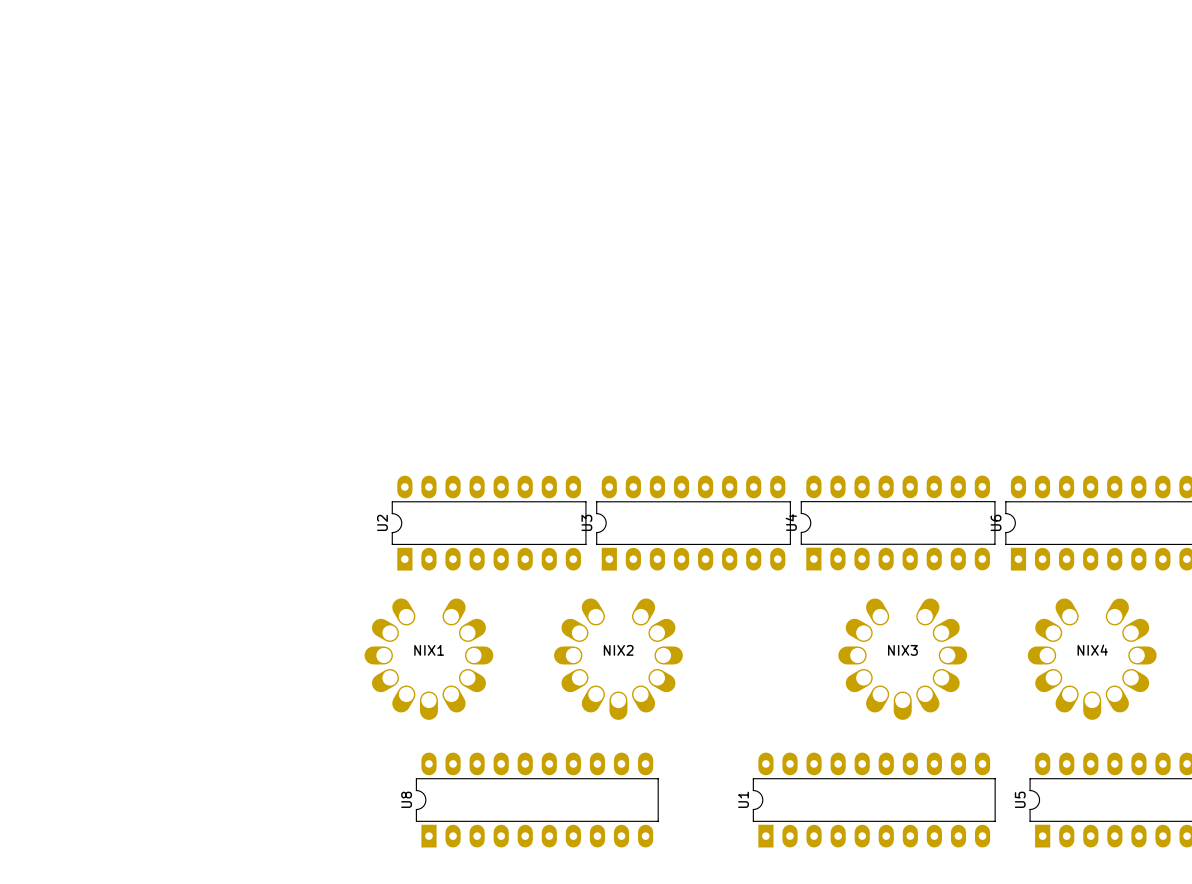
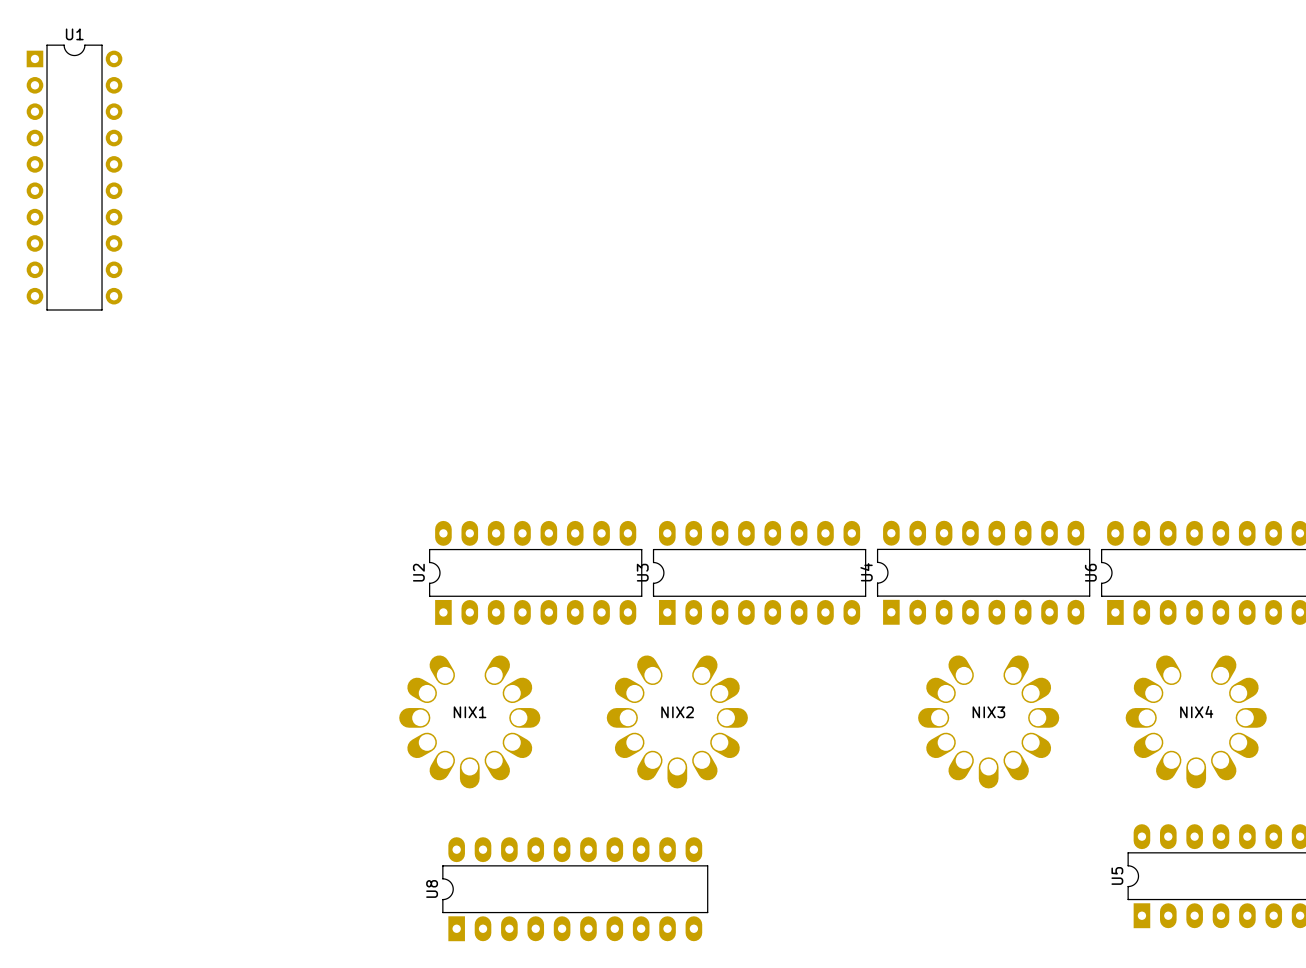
U1 footprint: [752, 752, 996, 848] -> [26, 44, 123, 311]
U1 name position: U1 (743, 799) -> U1 (74, 34)
U8 position: (537, 800) -> (575, 889)

